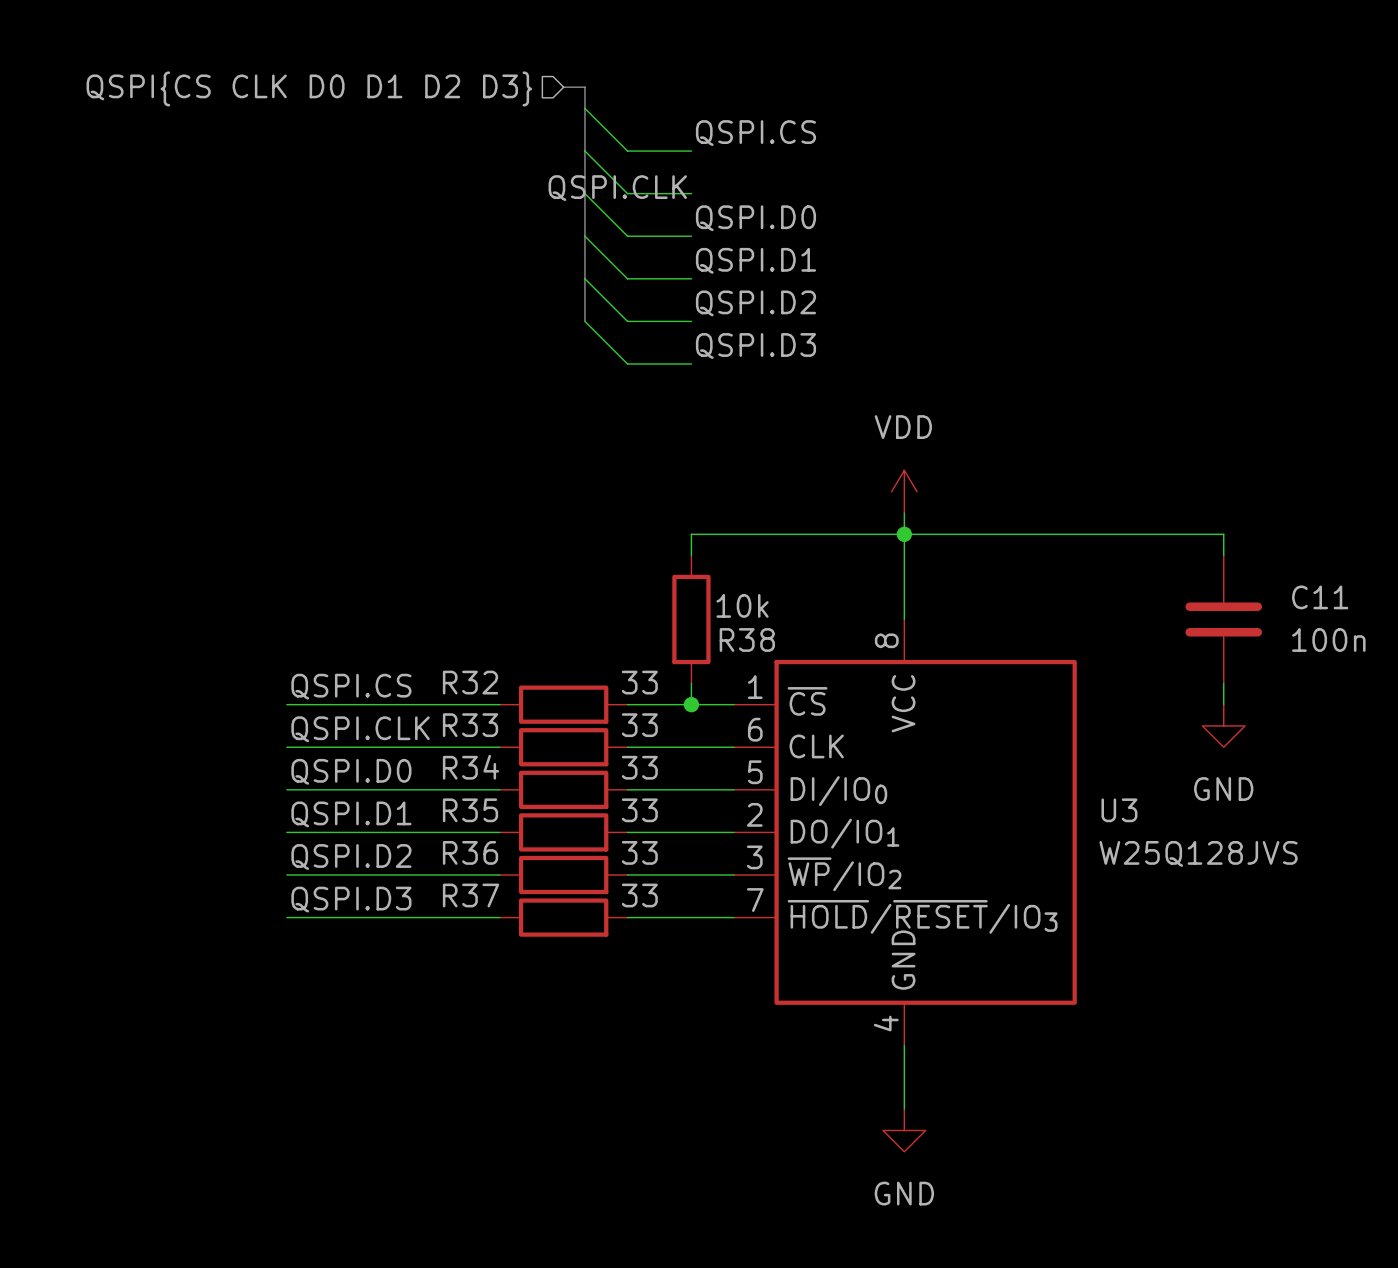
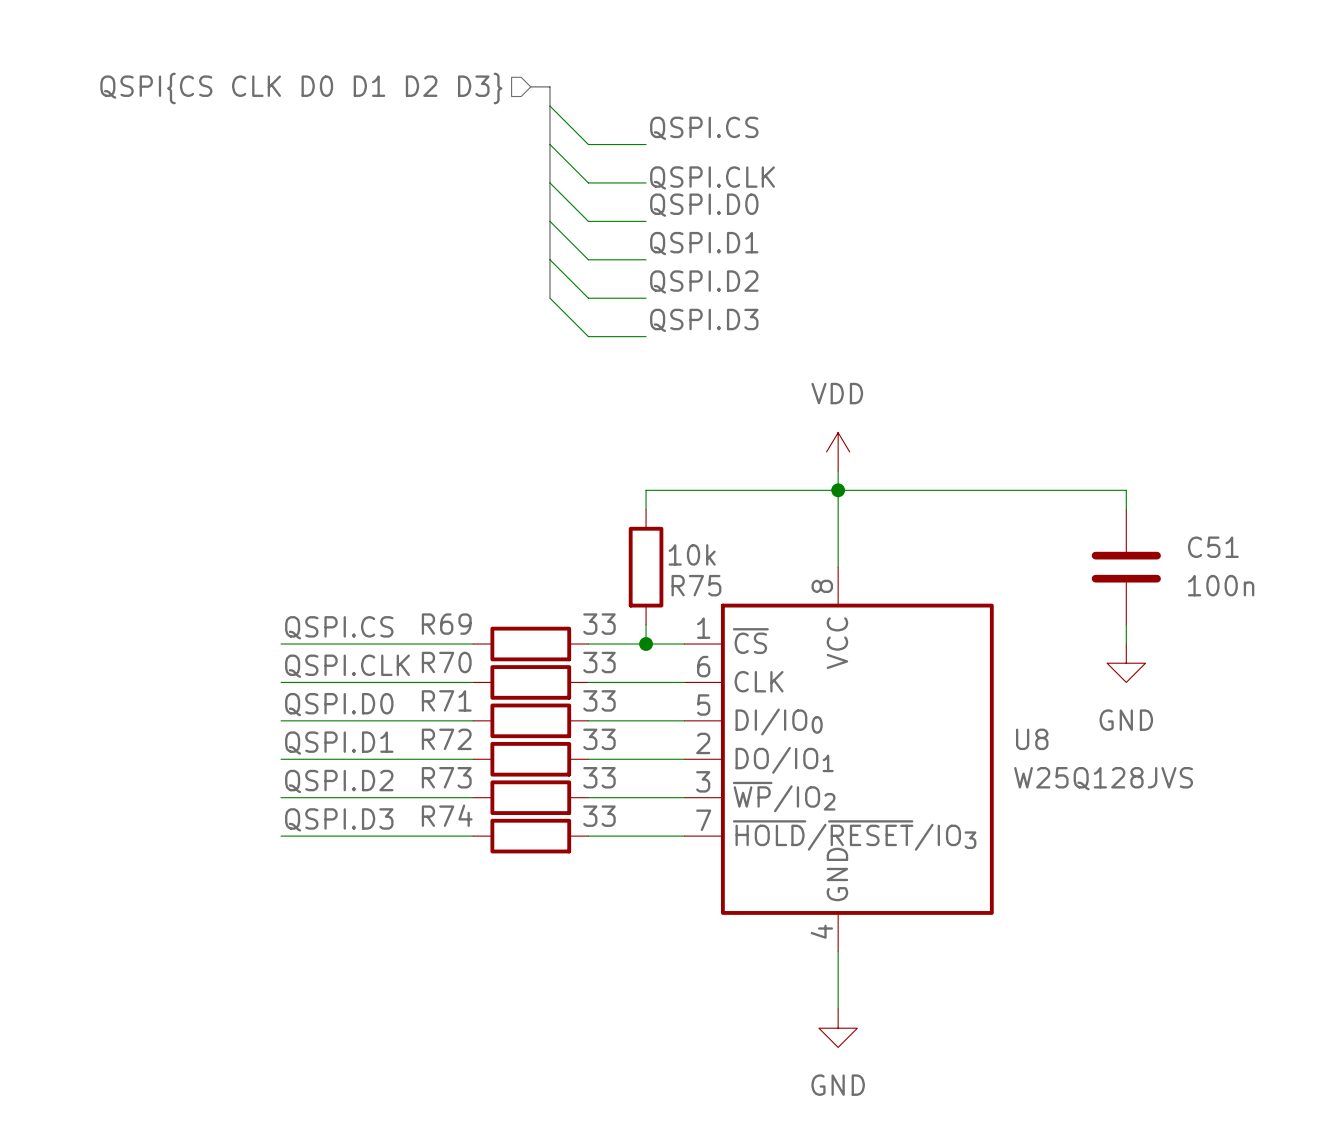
label position: QSPI.CLK (617, 188) -> QSPI.CLK (712, 177)
C11 name: C11 (1320, 597) -> C51 (1213, 547)
R38 name: R38 (747, 639) -> R75 (696, 585)
R32 name: R32 (470, 682) -> R69 (446, 624)
R33 name: R33 (470, 725) -> R70 (446, 662)
R34 name: R34 (471, 767) -> R71 (446, 700)
R35 name: R35 (470, 810) -> R72 (446, 739)
U3 name: U3 (1119, 810) -> U8 (1032, 739)
R36 name: R36 (470, 852) -> R73 (446, 777)
R37 name: R37 (471, 895) -> R74 (447, 815)

